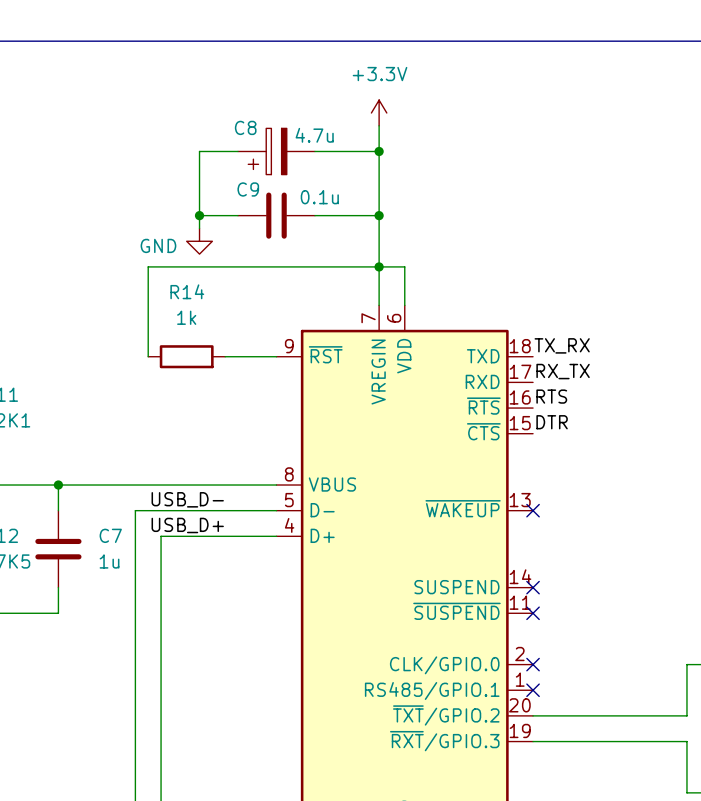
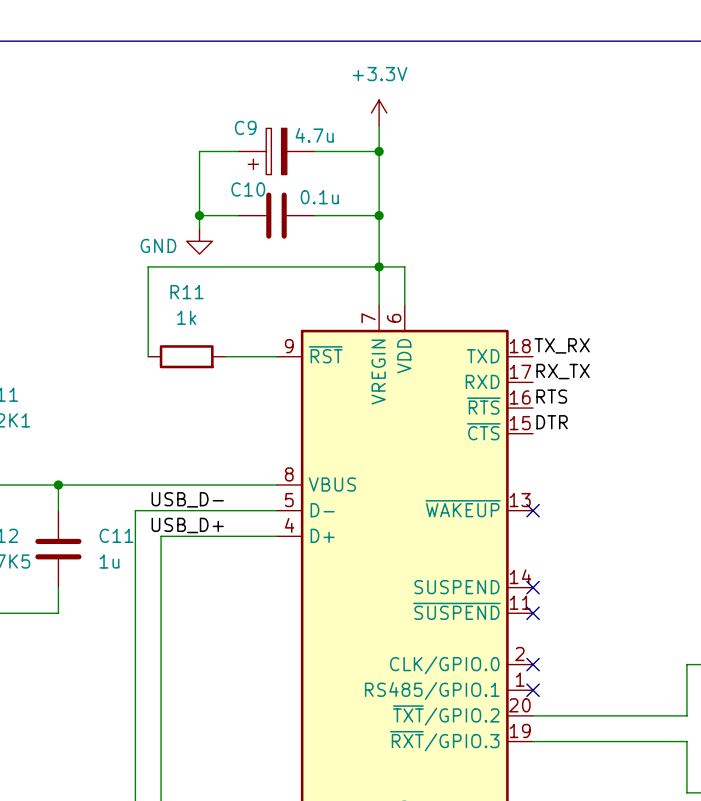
C8 name: C8 (245, 127) -> C9 (245, 127)
C9 name: C9 (248, 189) -> C10 (248, 189)
R14 name: R14 (187, 291) -> R11 (187, 292)
C7 name: C7 (110, 535) -> C11 (116, 535)

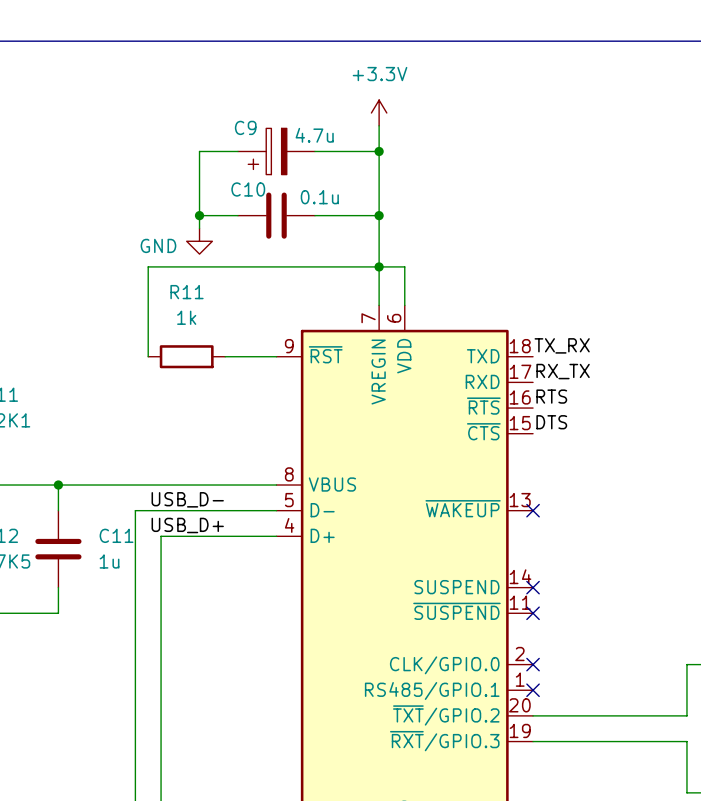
label: DTR (552, 422) -> DTS (551, 422)

